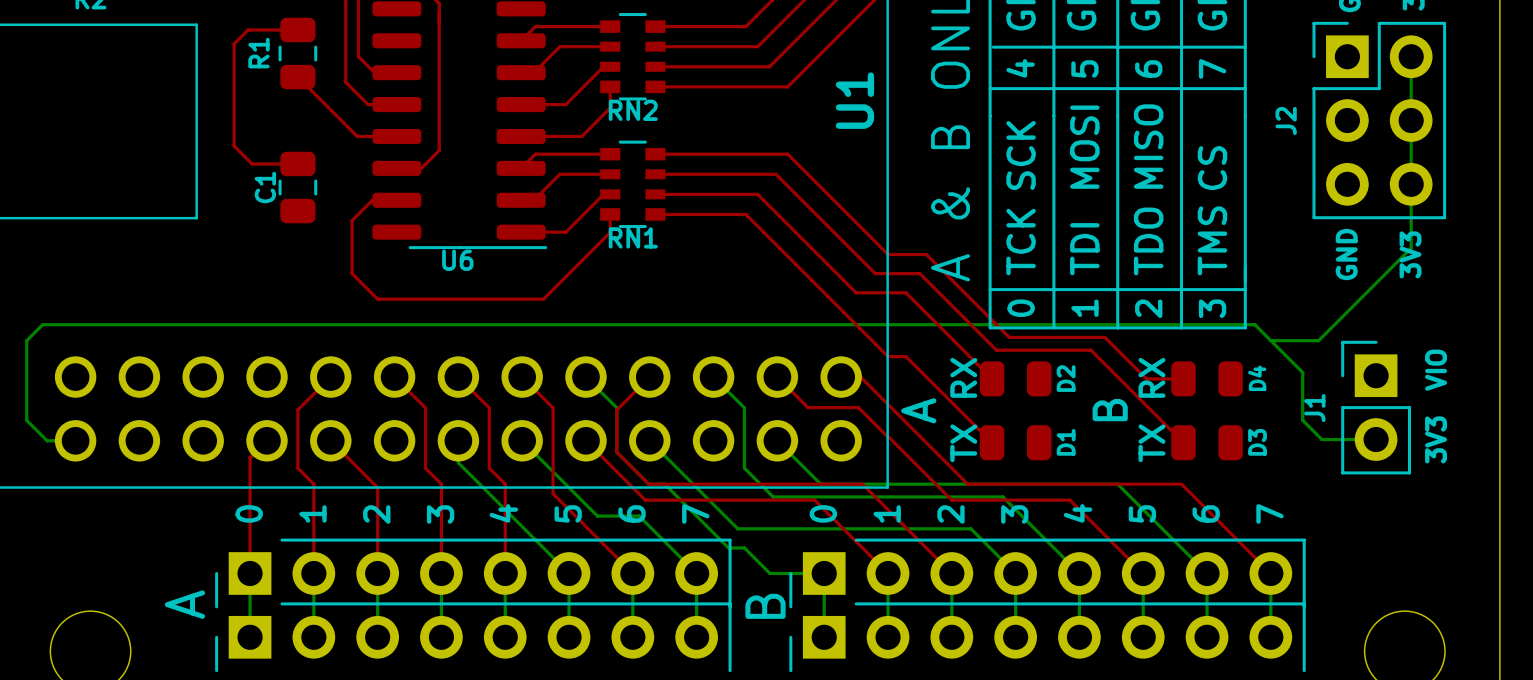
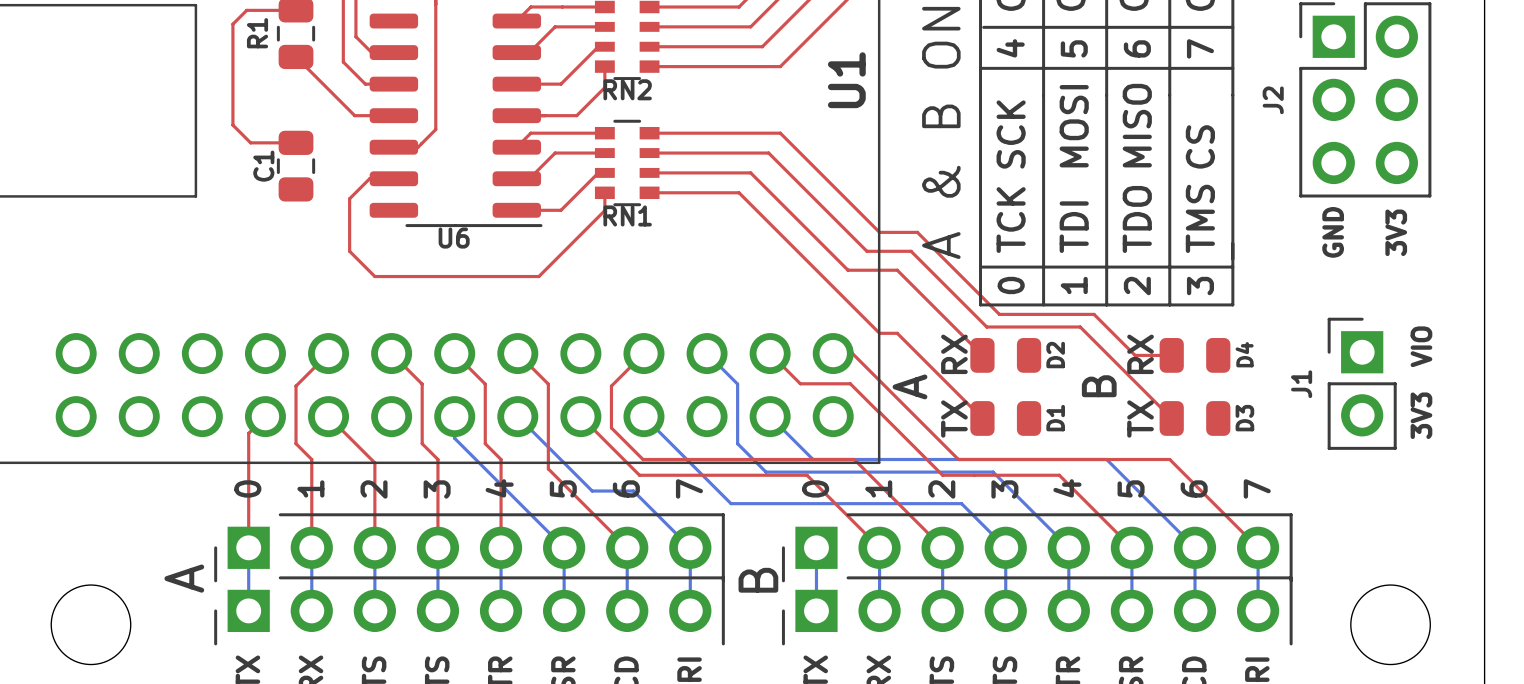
bottom track: (1411, 56) (1411, 248) (1318, 340) (1270, 340) -> none
bottom track: (585, 377) (616, 407) (616, 452) (648, 484) (664, 484) (728, 547) (744, 547) (770, 573) (824, 573) -> none
bottom track: (1376, 439) (1321, 439) (1302, 420) (1302, 372) (1254, 324) (42, 324) (26, 340) (26, 420) (47, 440) (75, 440) -> none

